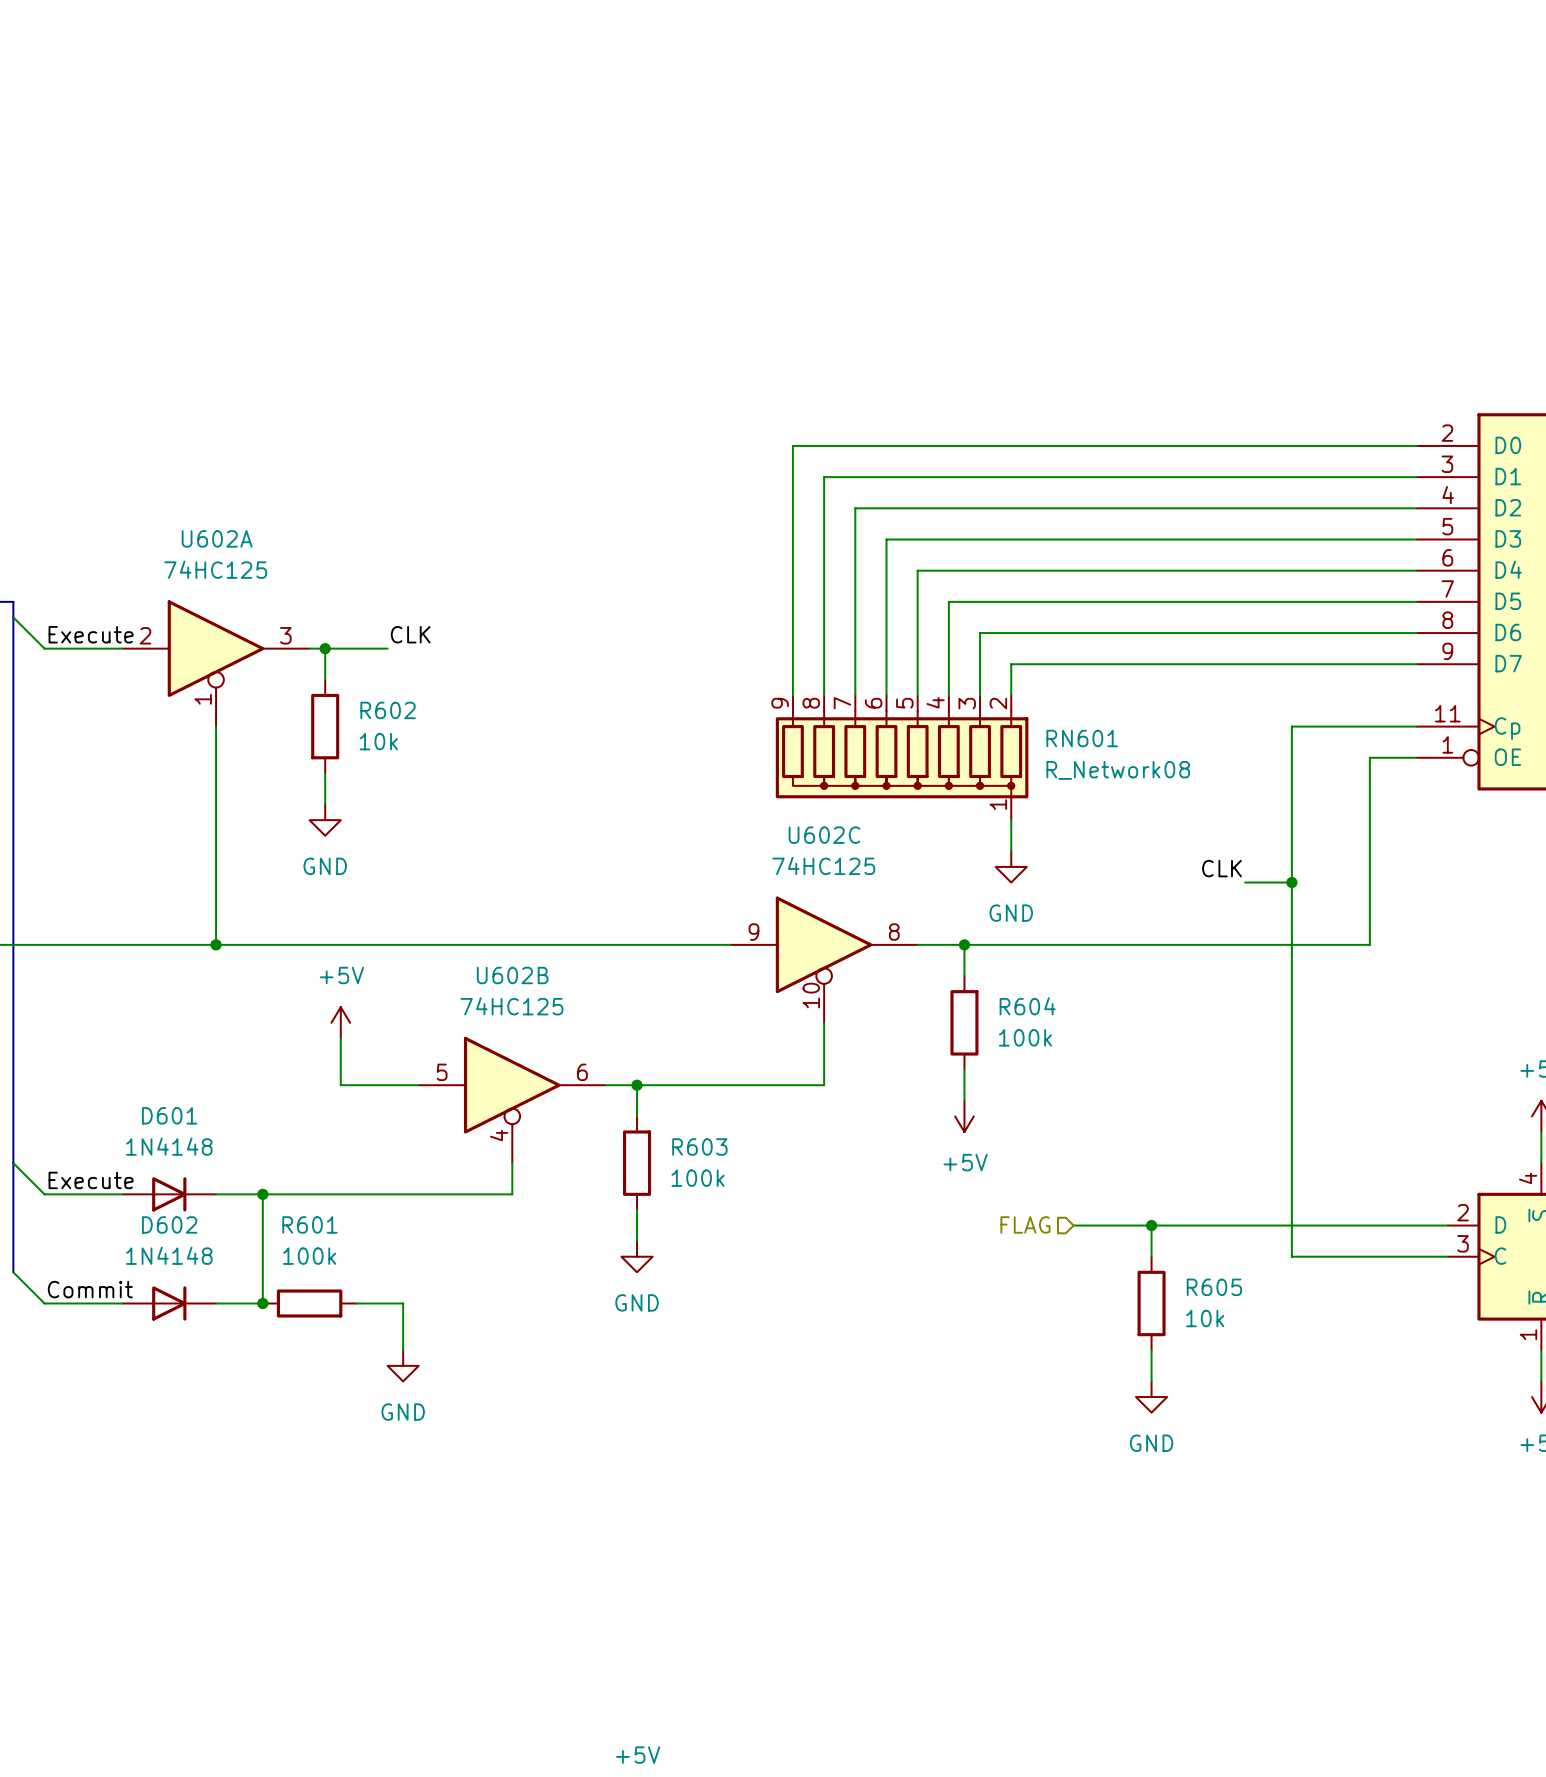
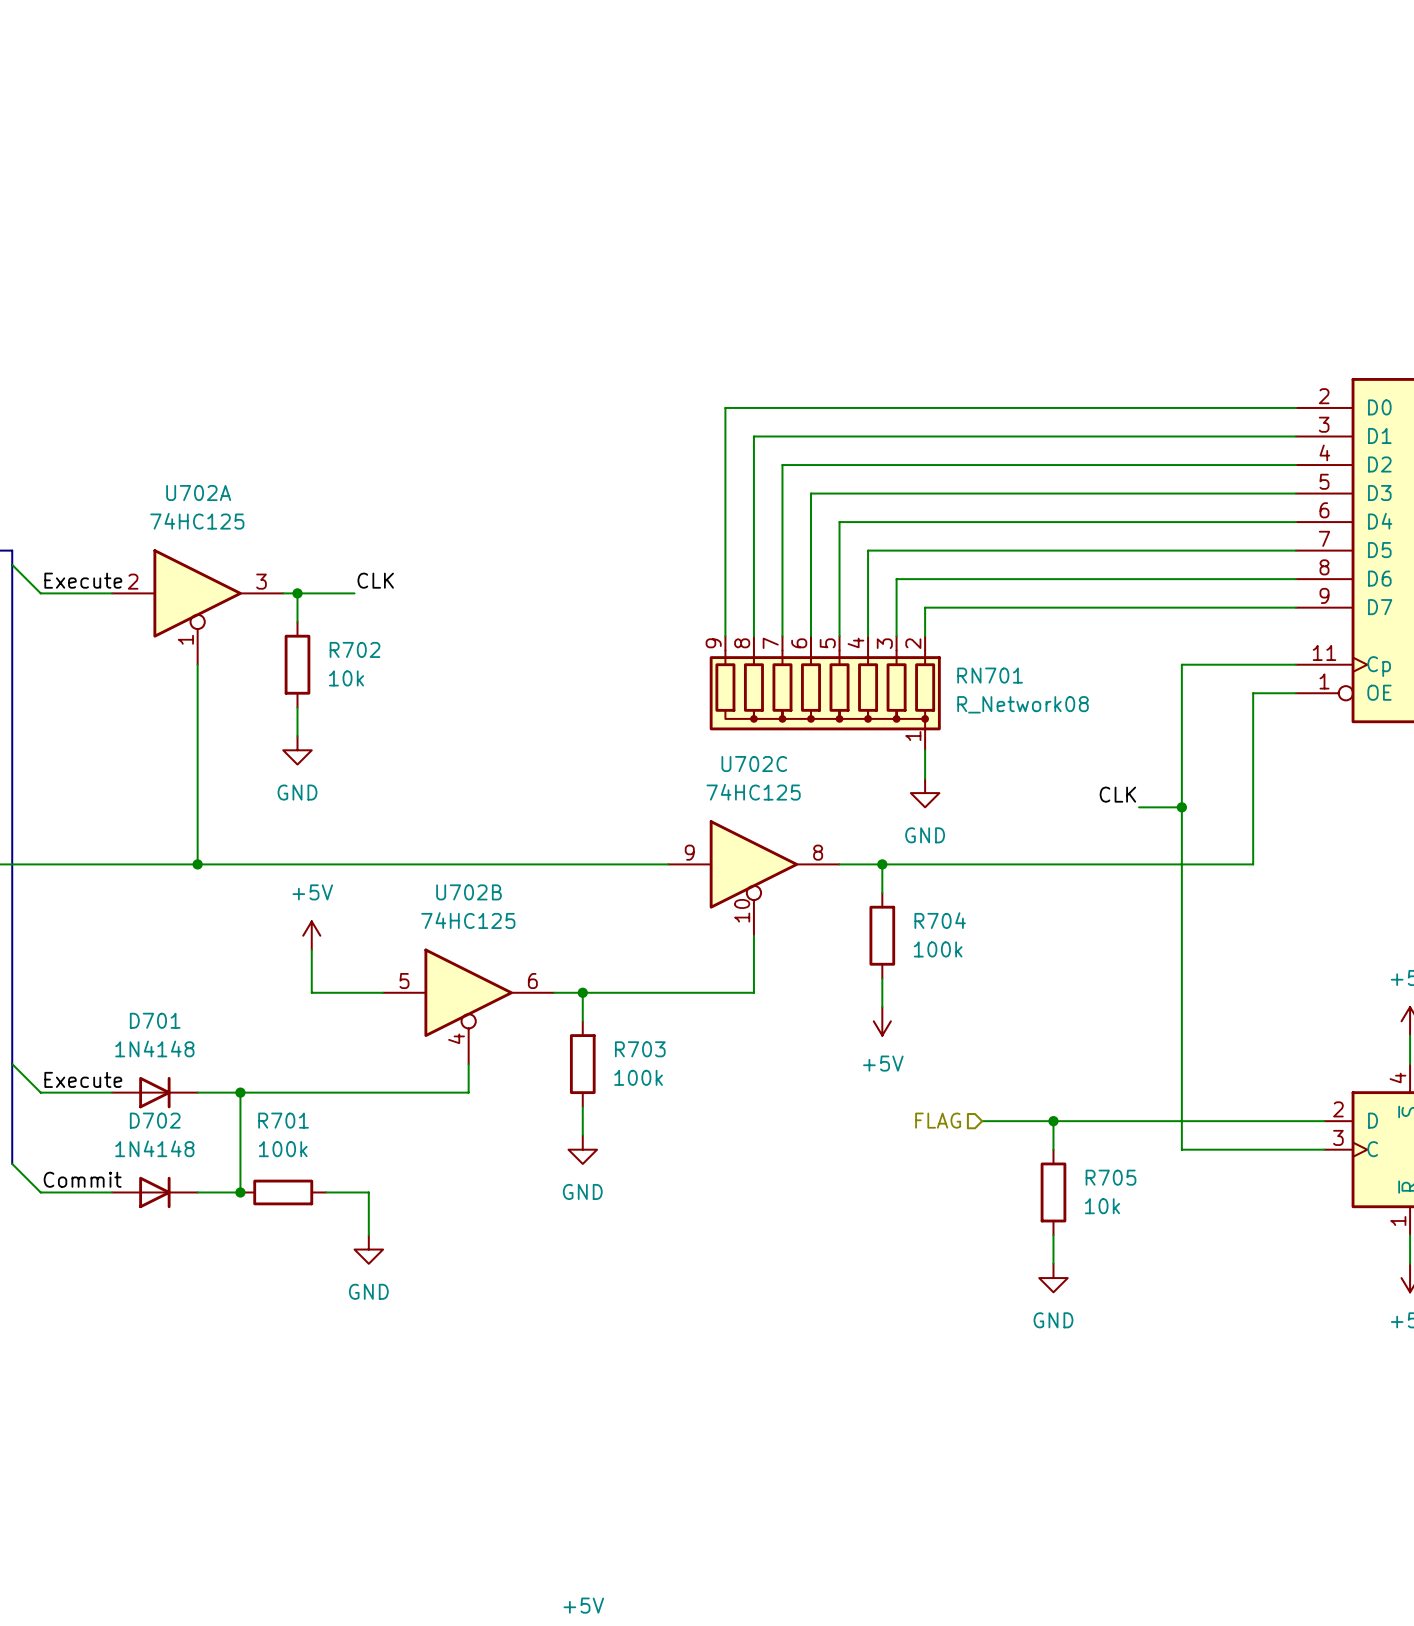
U602A name: U602A (217, 538) -> U702A (198, 493)
R602 name: R602 (388, 710) -> R702 (355, 649)
RN601 name: RN601 (1082, 738) -> RN701 (990, 675)
U602C name: U602C (824, 835) -> U702C (754, 764)
U602B name: U602B (512, 975) -> U702B (469, 892)
R604 name: R604 (1027, 1006) -> R704 (940, 920)
D601 name: D601 (169, 1115) -> D701 (155, 1020)
R603 name: R603 (699, 1146) -> R703 (640, 1049)
D602 name: D602 (169, 1224) -> D702 (155, 1120)
R601 name: R601 (309, 1224) -> R701 (283, 1120)
R605 name: R605 (1214, 1287) -> R705 (1110, 1177)

